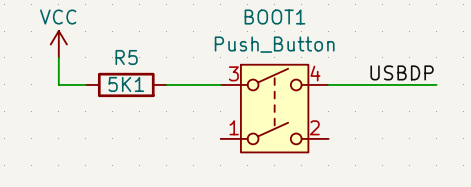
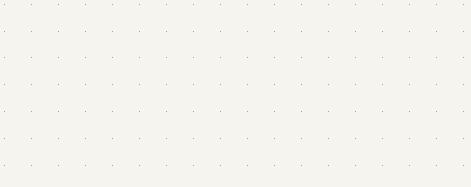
power symbol: VCC (58, 44) -> none
wire: (58, 57) (58, 84) (85, 84) -> none
label: USBDP (402, 72) -> none
R5: 5K1 (126, 84) -> none
wire: (166, 84) (220, 84) -> none
wire: (328, 84) (436, 84) -> none
BOOT1: Push_Button (274, 108) -> none

